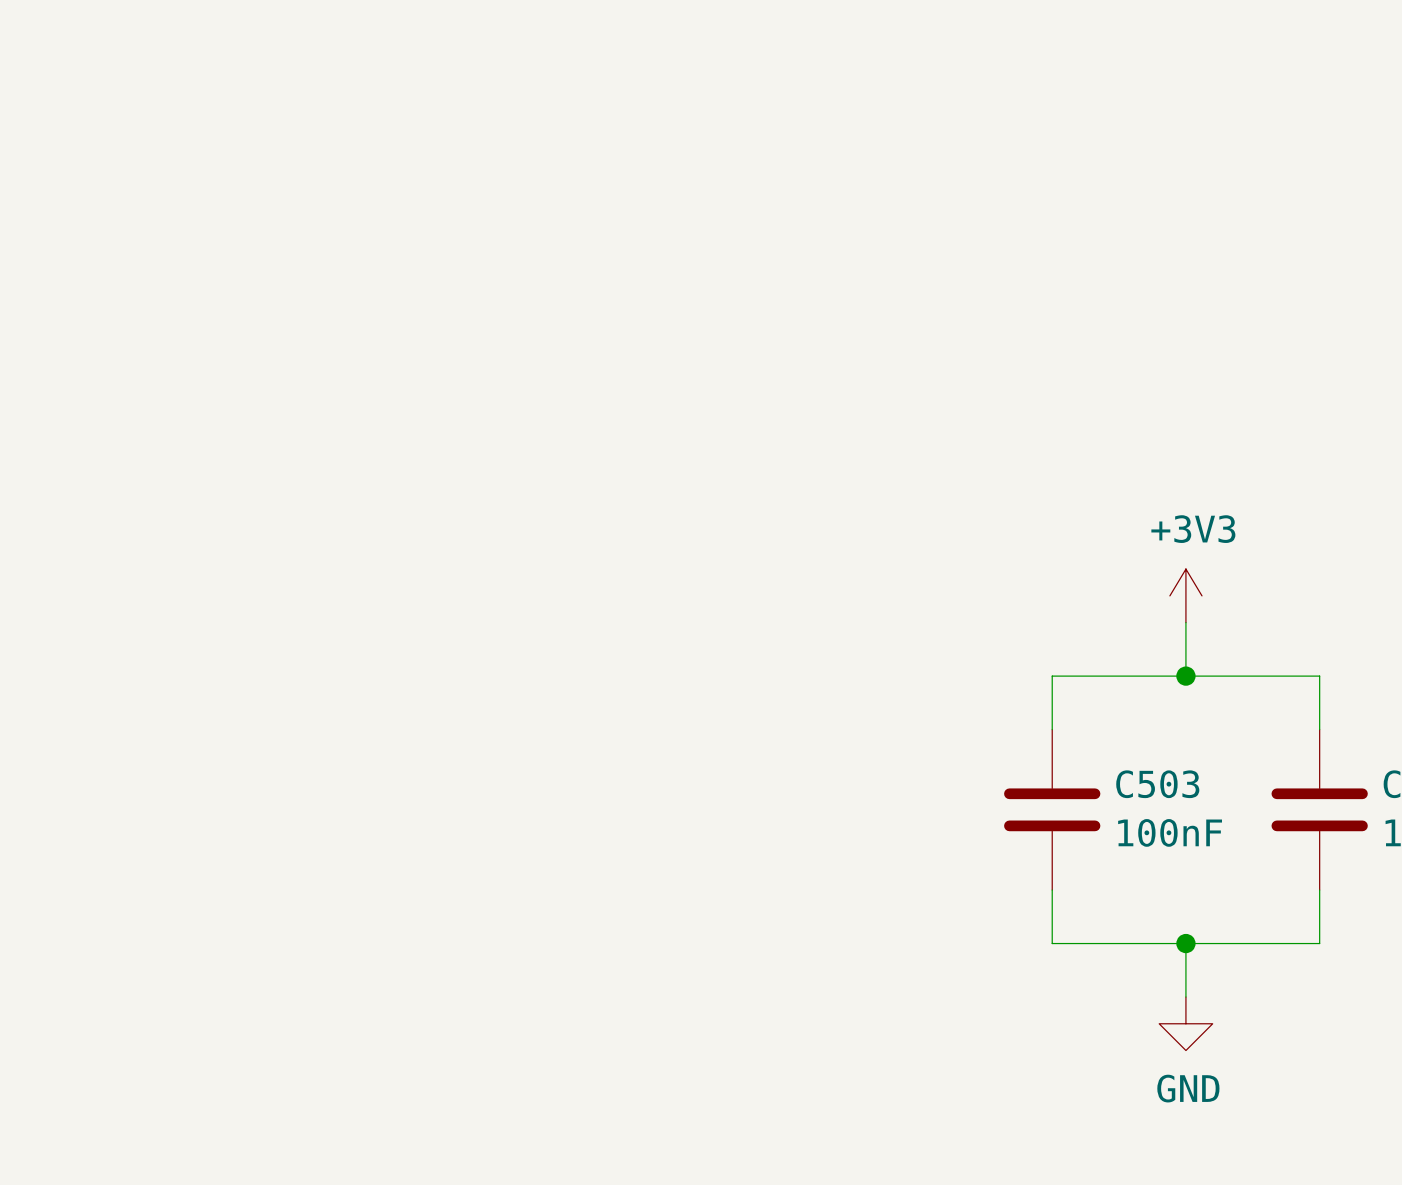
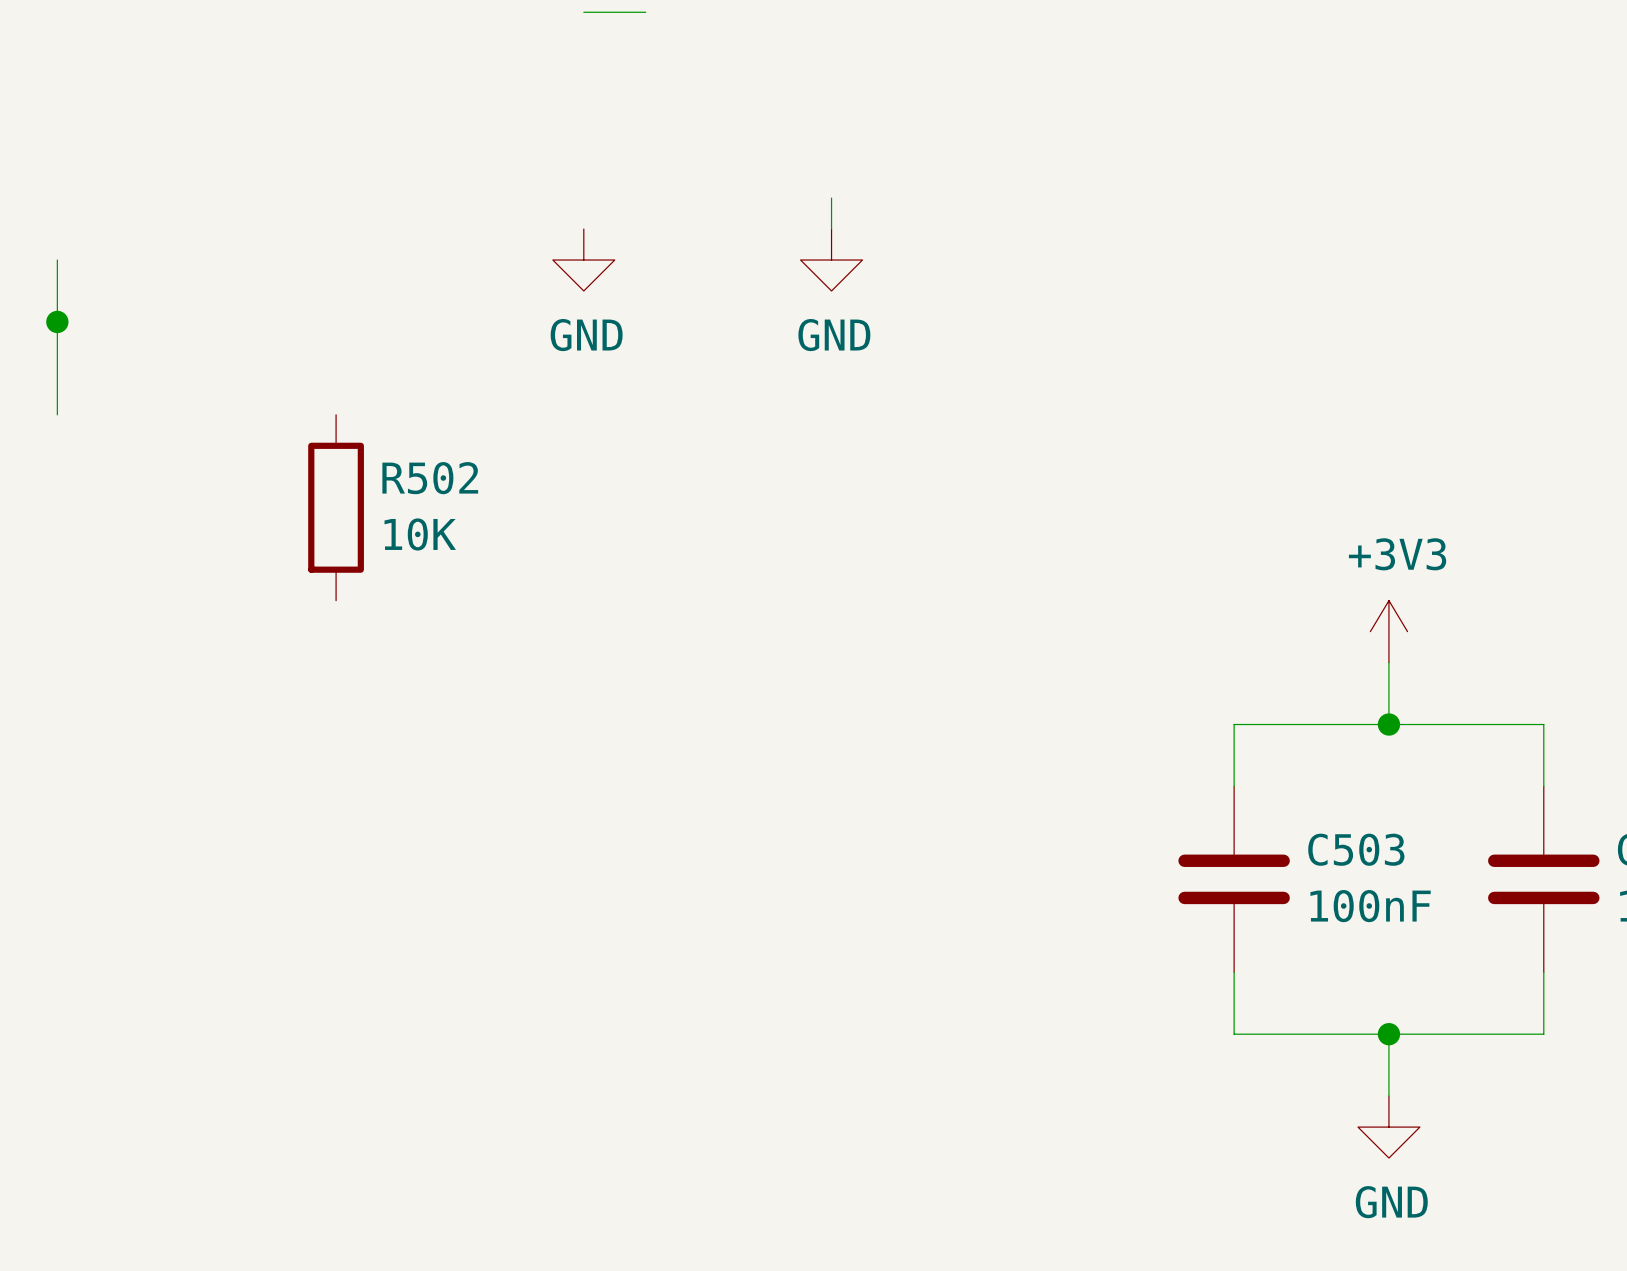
wire: none -> (583, 12) (645, 12)
wire: none -> (831, 198) (831, 229)
wire: none -> (57, 260) (57, 414)
power symbol: none -> GND (583, 260)
power symbol: none -> GND (831, 260)
junction: none -> (57, 321)
R502: none -> 10K (336, 507)

